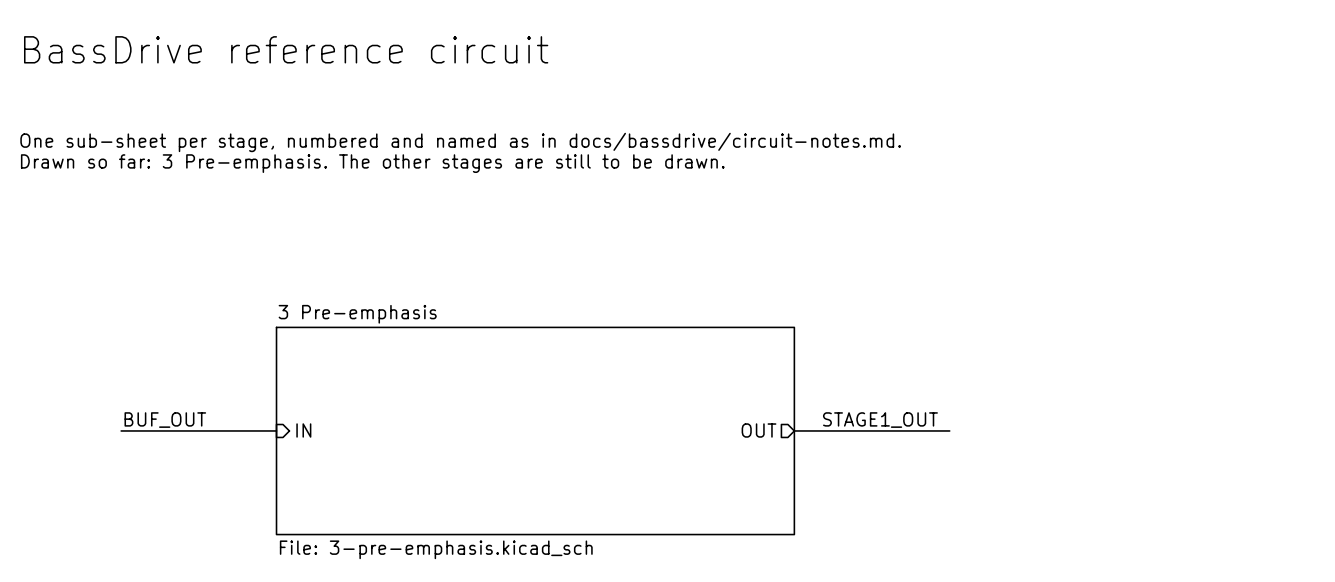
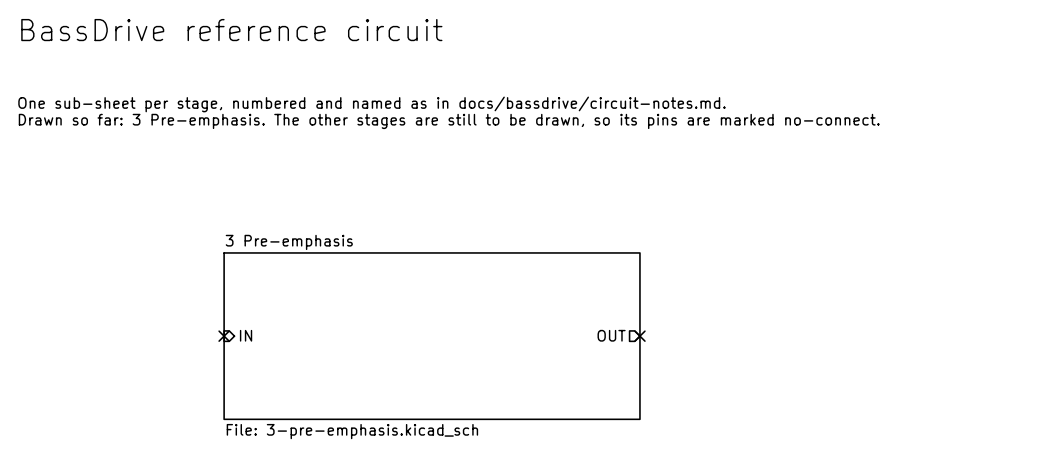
text: Drawn so far: 3 Pre-emphasis. The other stages are still to be drawn. (372, 163) -> Drawn so far: 3 Pre-emphasis. The other stages are still to be drawn, so its pins are marked no-connect. (449, 121)
label: BUF_OUT (165, 420) -> none
label: STAGE1_OUT (880, 420) -> none
wire: (121, 430) (276, 430) -> none
no-connect mark: none -> (224, 336)
wire: (794, 430) (949, 430) -> none
no-connect mark: none -> (639, 336)

